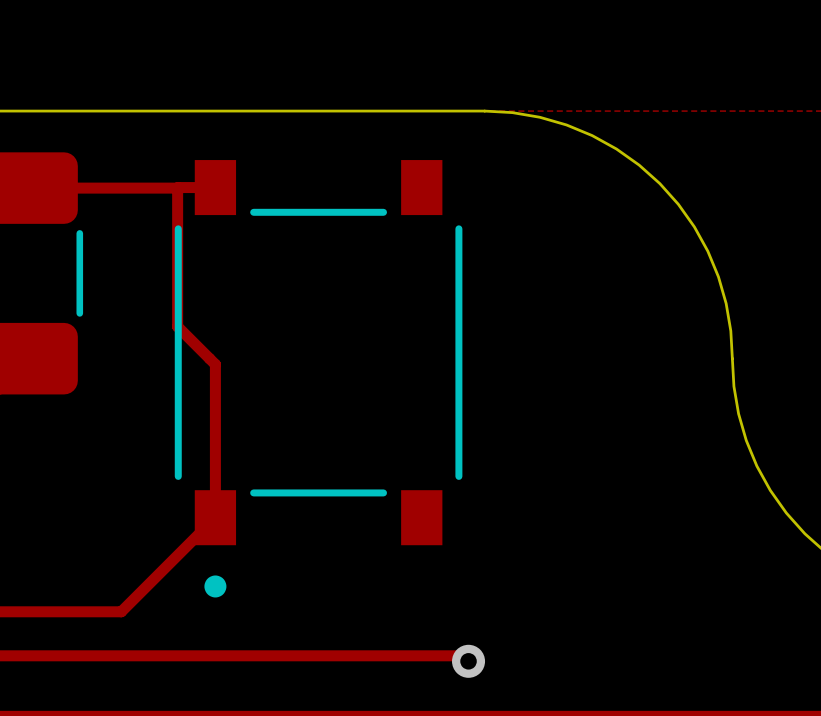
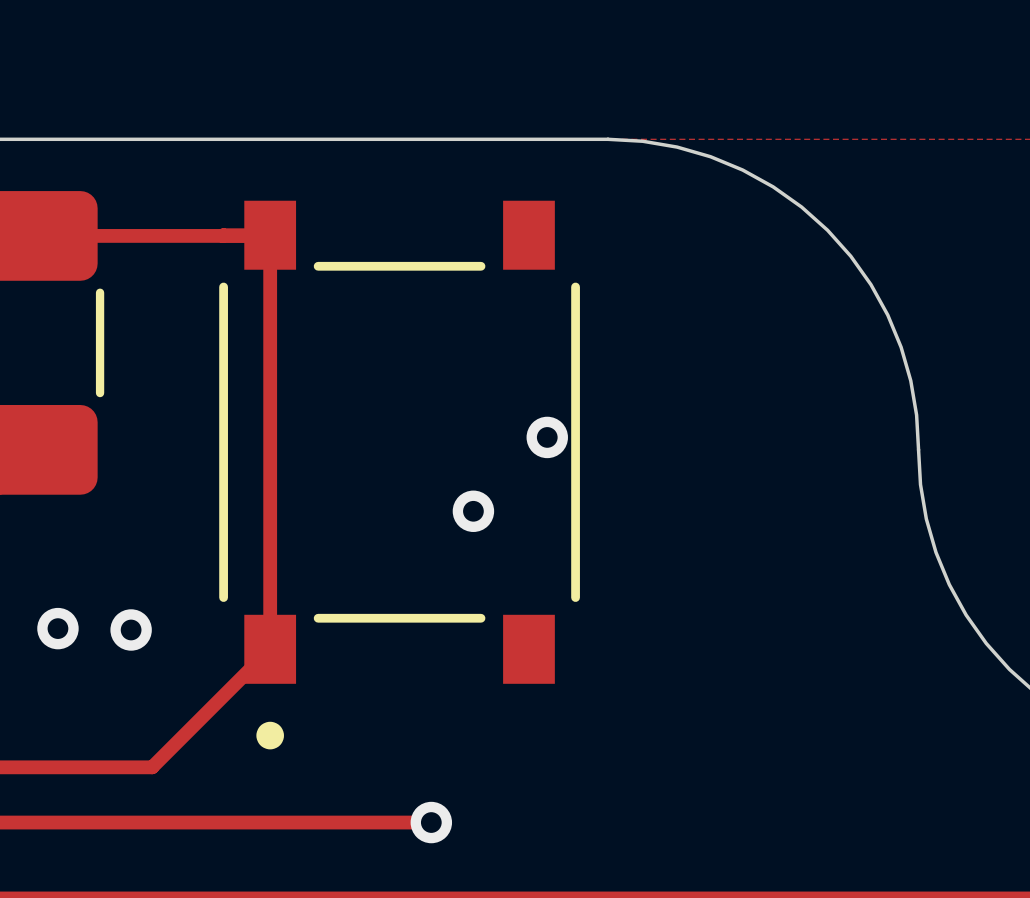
track: (177, 188) (177, 326) (215, 364) -> (222, 235) (270, 235) (270, 457)
via: none -> (547, 437)
via: none -> (473, 511)
via: none -> (57, 628)
via: none -> (131, 629)
track: (343, 655) (463, 655) (468, 661) -> none
via position: (468, 661) -> (431, 822)

